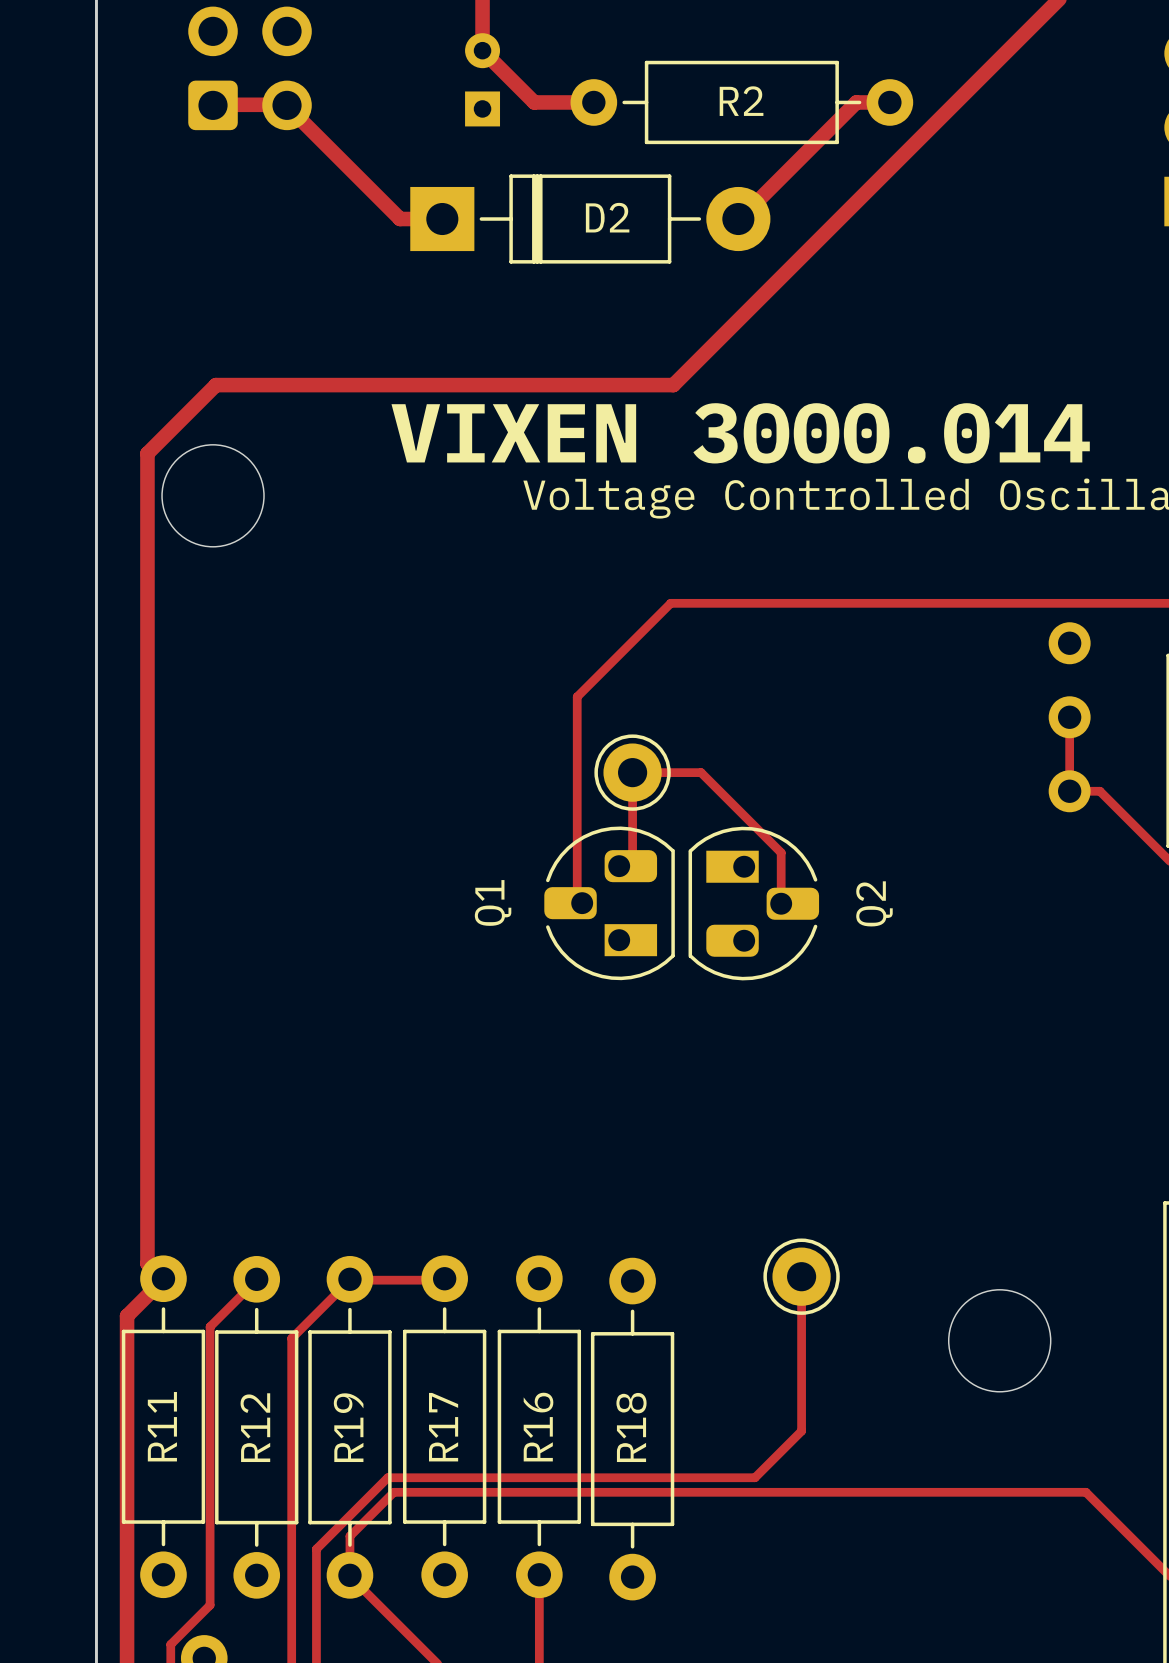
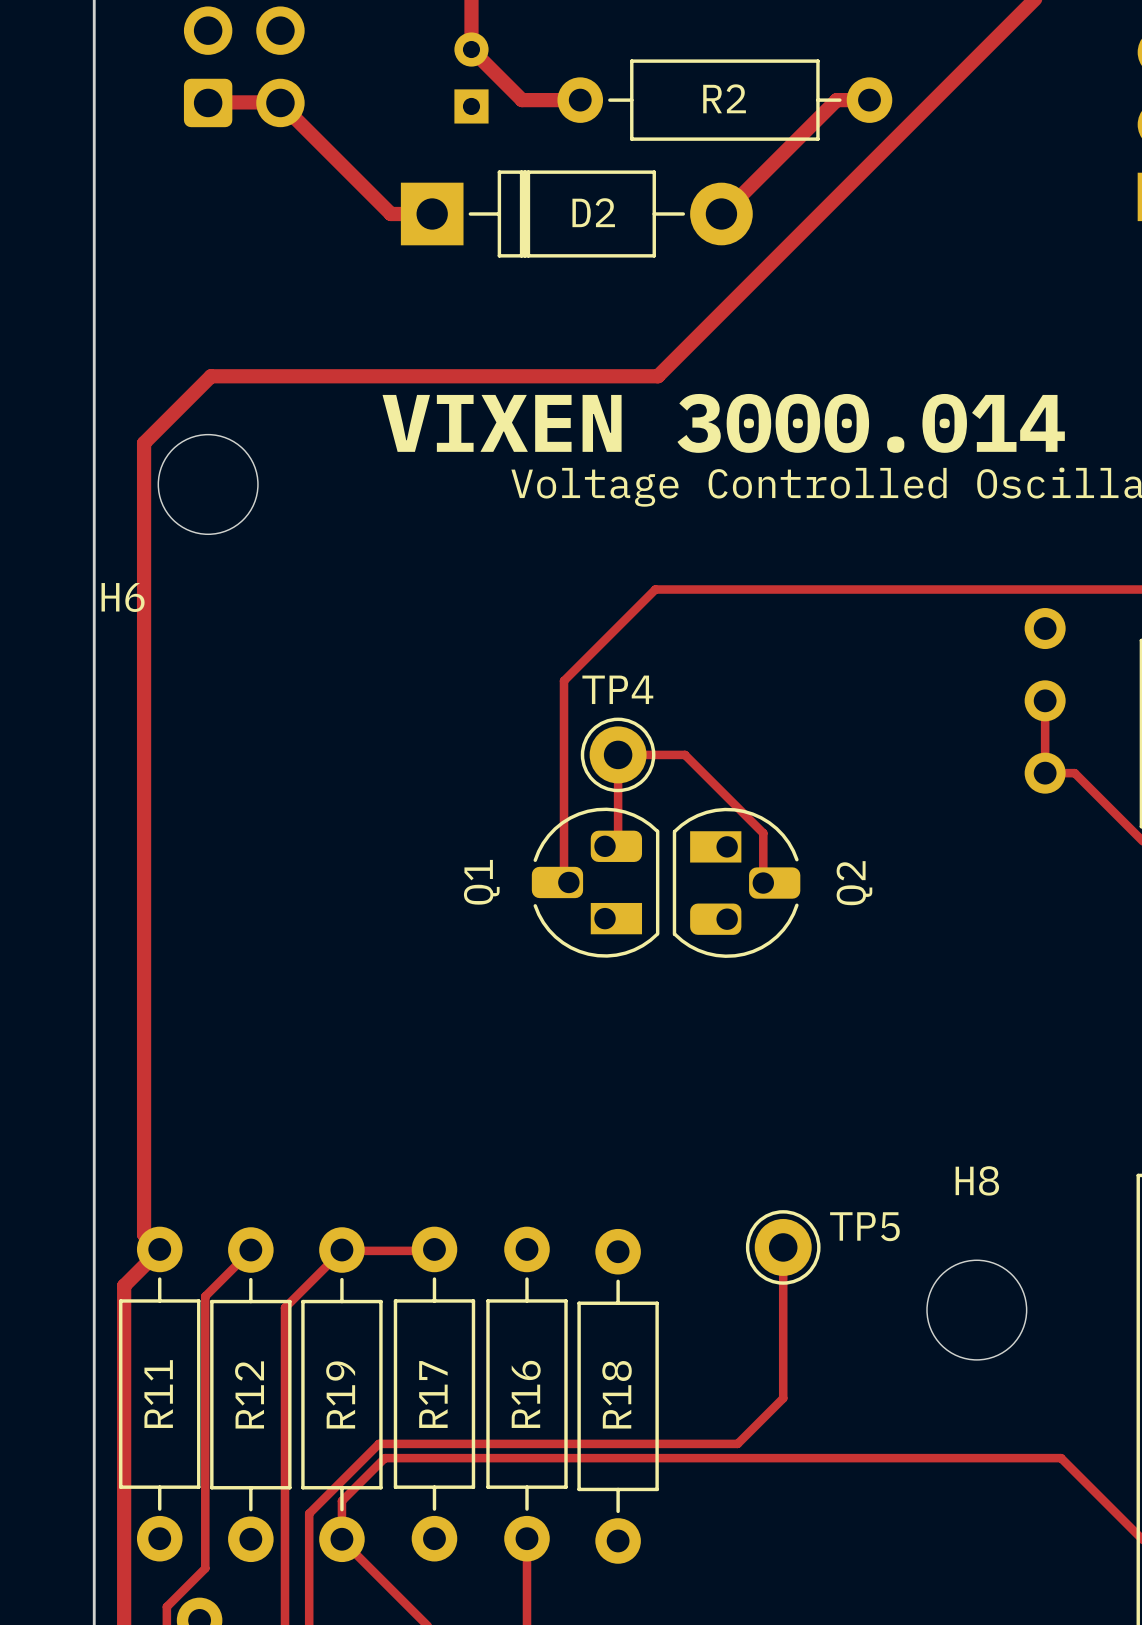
H6 name: none -> H6 (123, 597)
TP4 name: none -> TP4 (617, 689)
H8 name: none -> H8 (977, 1180)
TP5 name: none -> TP5 (864, 1226)

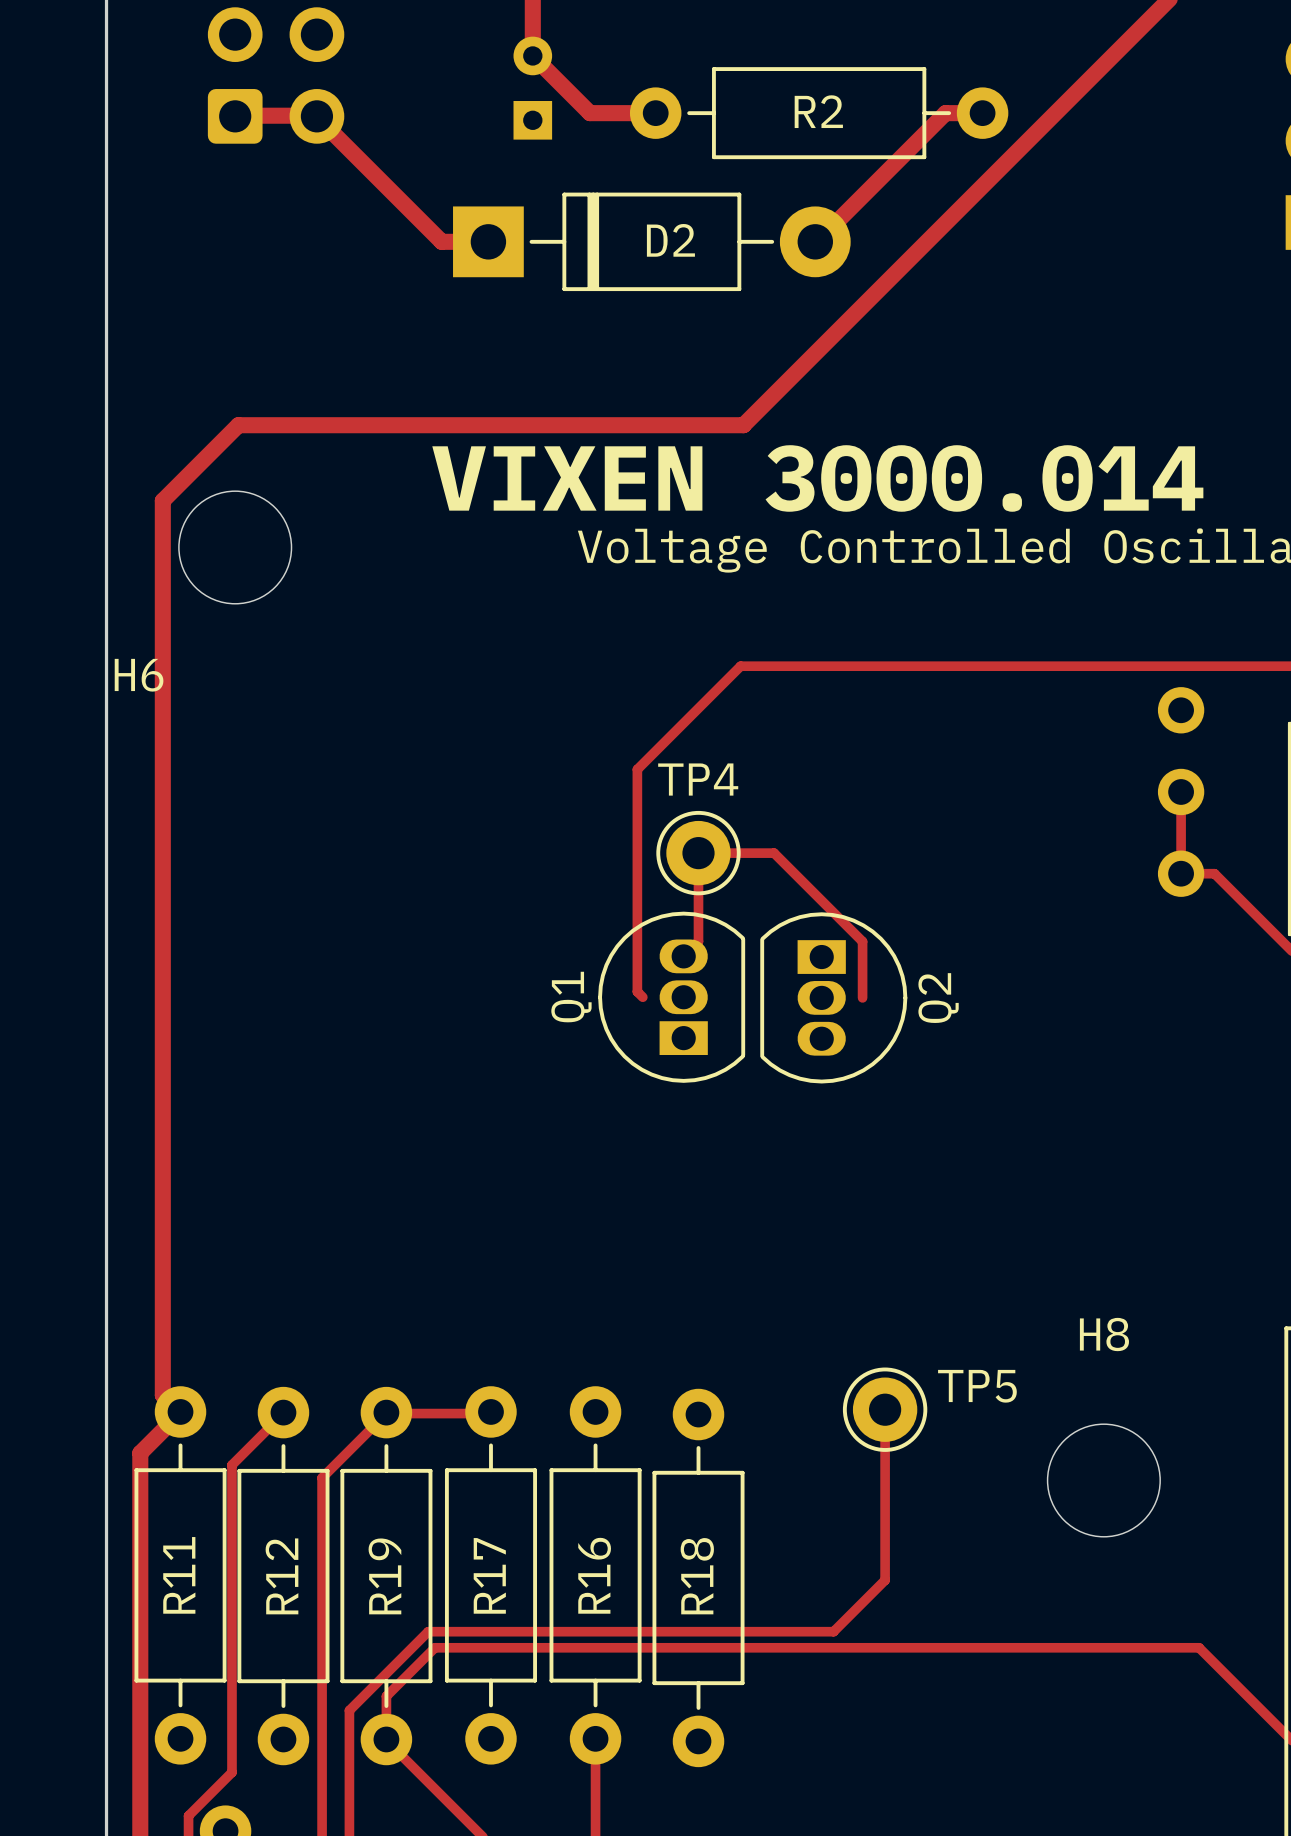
Q1 footprint: [531, 807, 660, 958] -> [598, 911, 746, 1083]
Q2 footprint: [672, 807, 801, 958] -> [760, 912, 908, 1084]

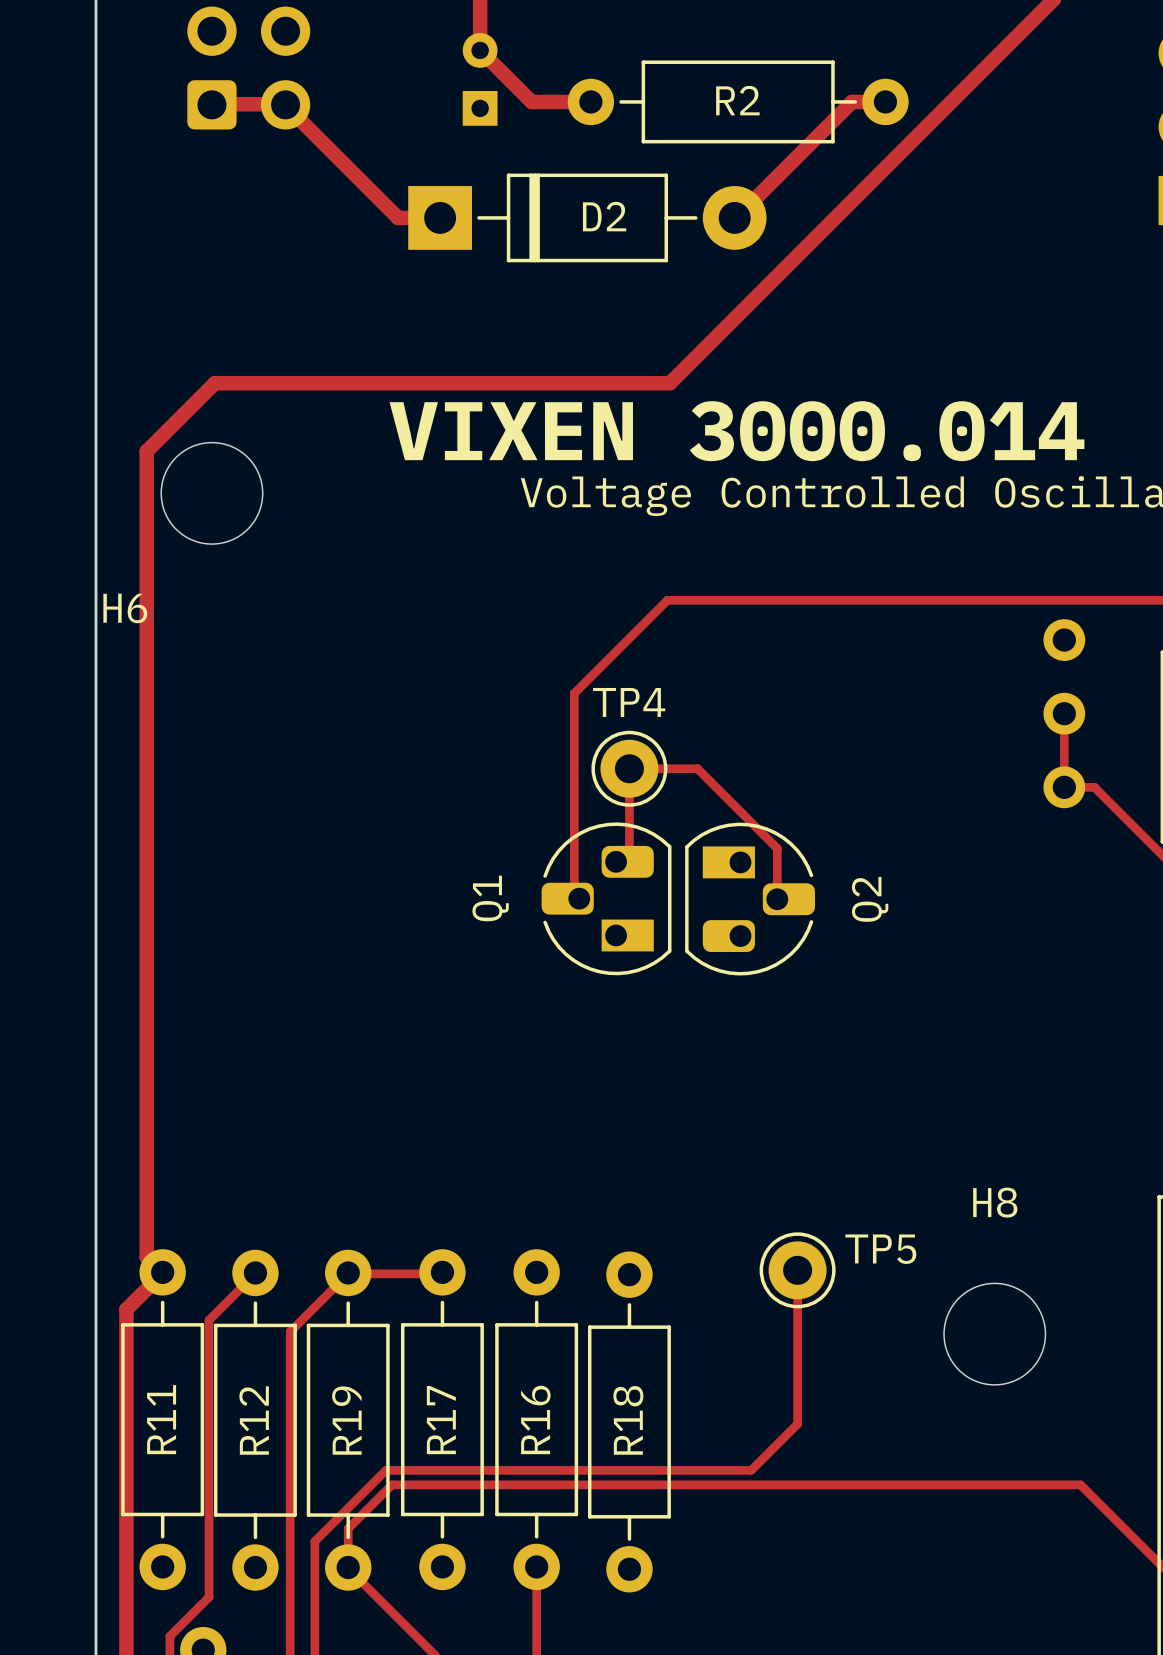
Q1 footprint: [598, 911, 746, 1083] -> [541, 822, 672, 976]
Q2 footprint: [760, 912, 908, 1084] -> [685, 822, 816, 976]

